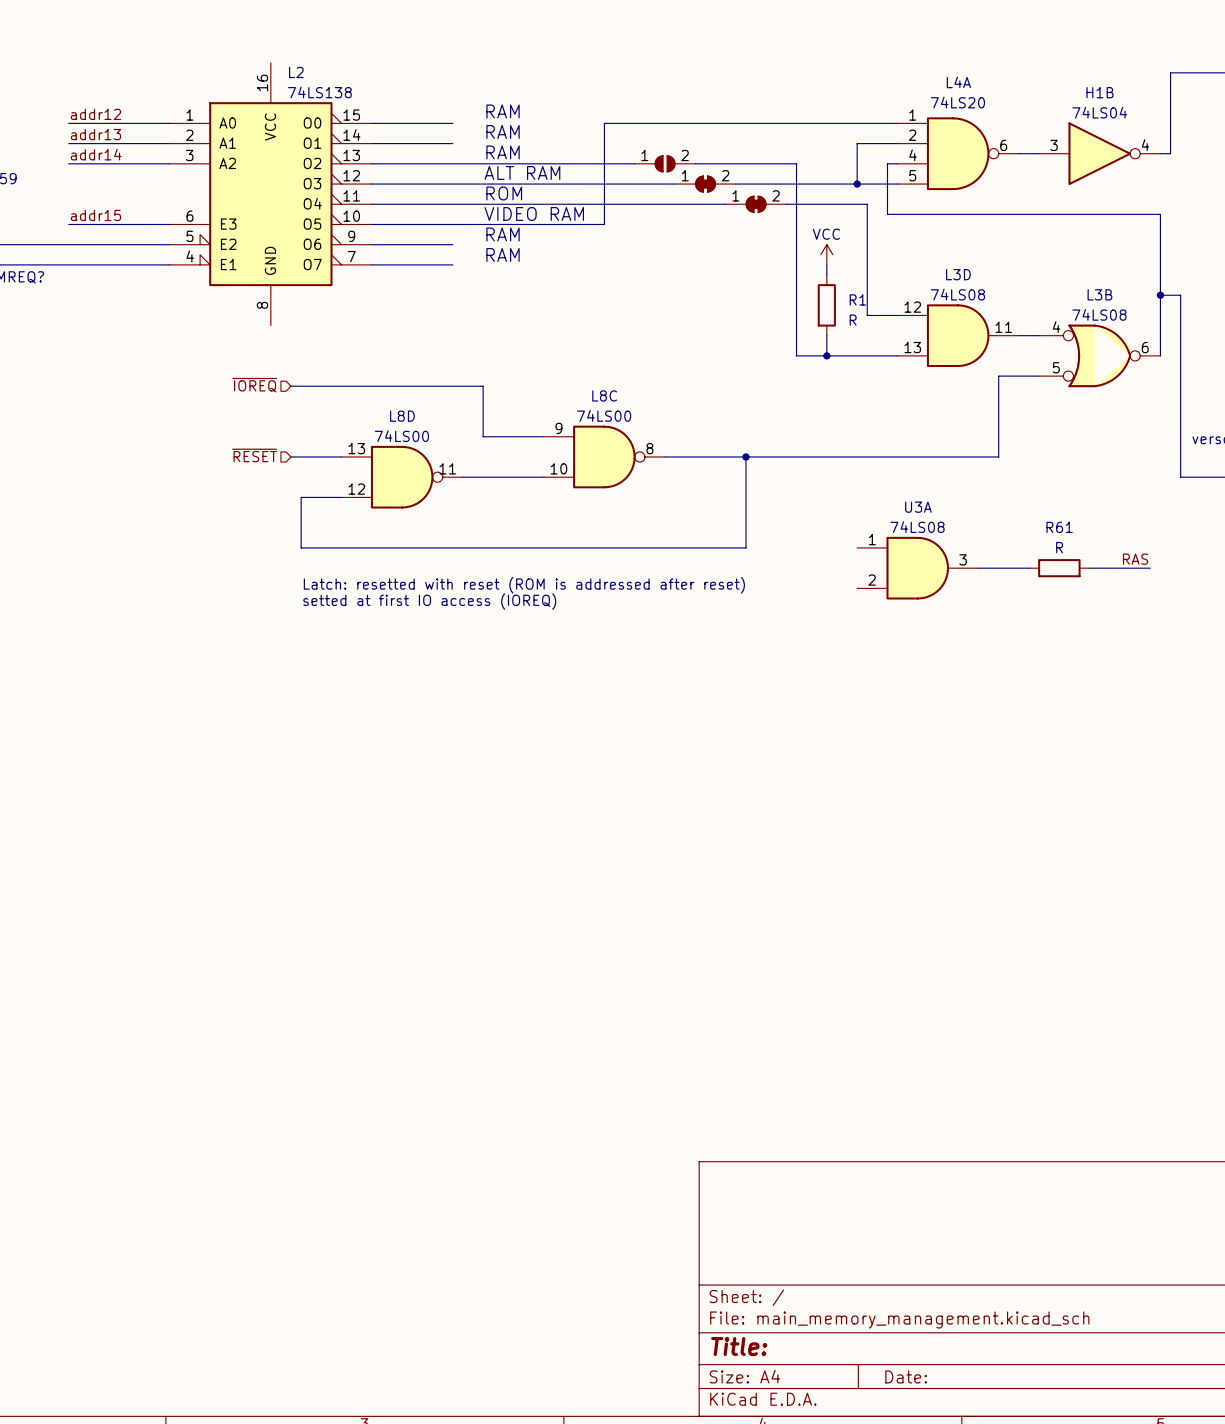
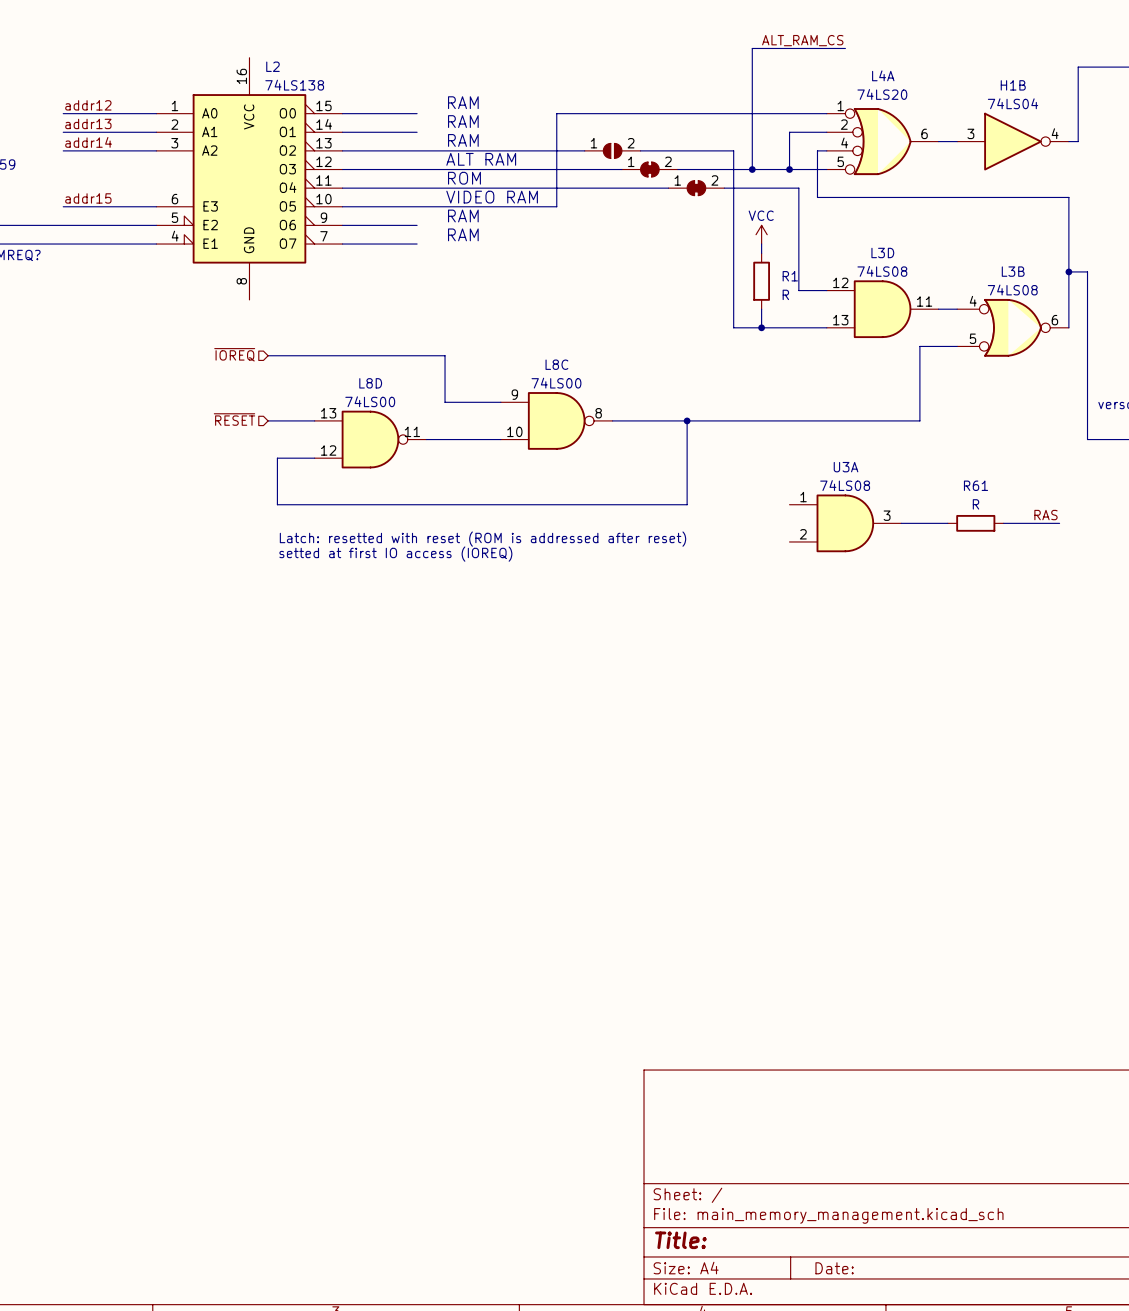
label: none -> ALT_RAM_CS (802, 40)
wire: none -> (845, 48) (752, 48) (752, 169)
L4A symbol: [897, 117, 1019, 191] -> [826, 108, 939, 176]
junction: none -> (752, 169)

